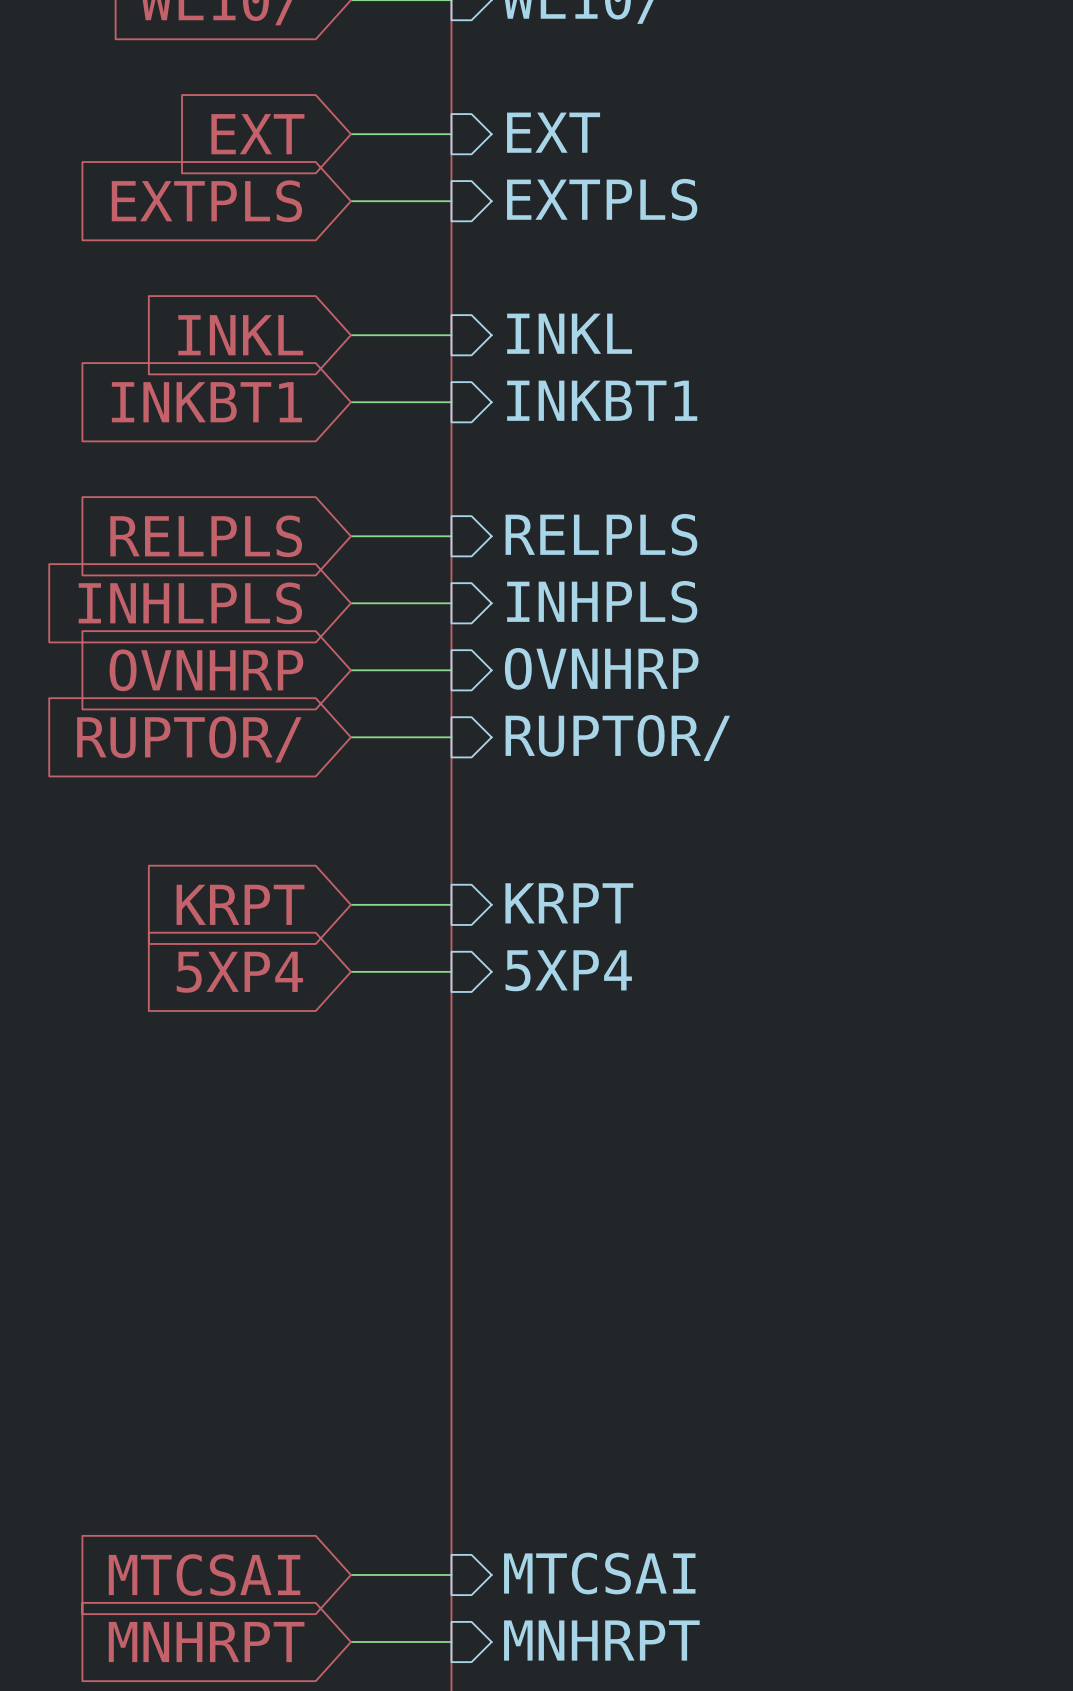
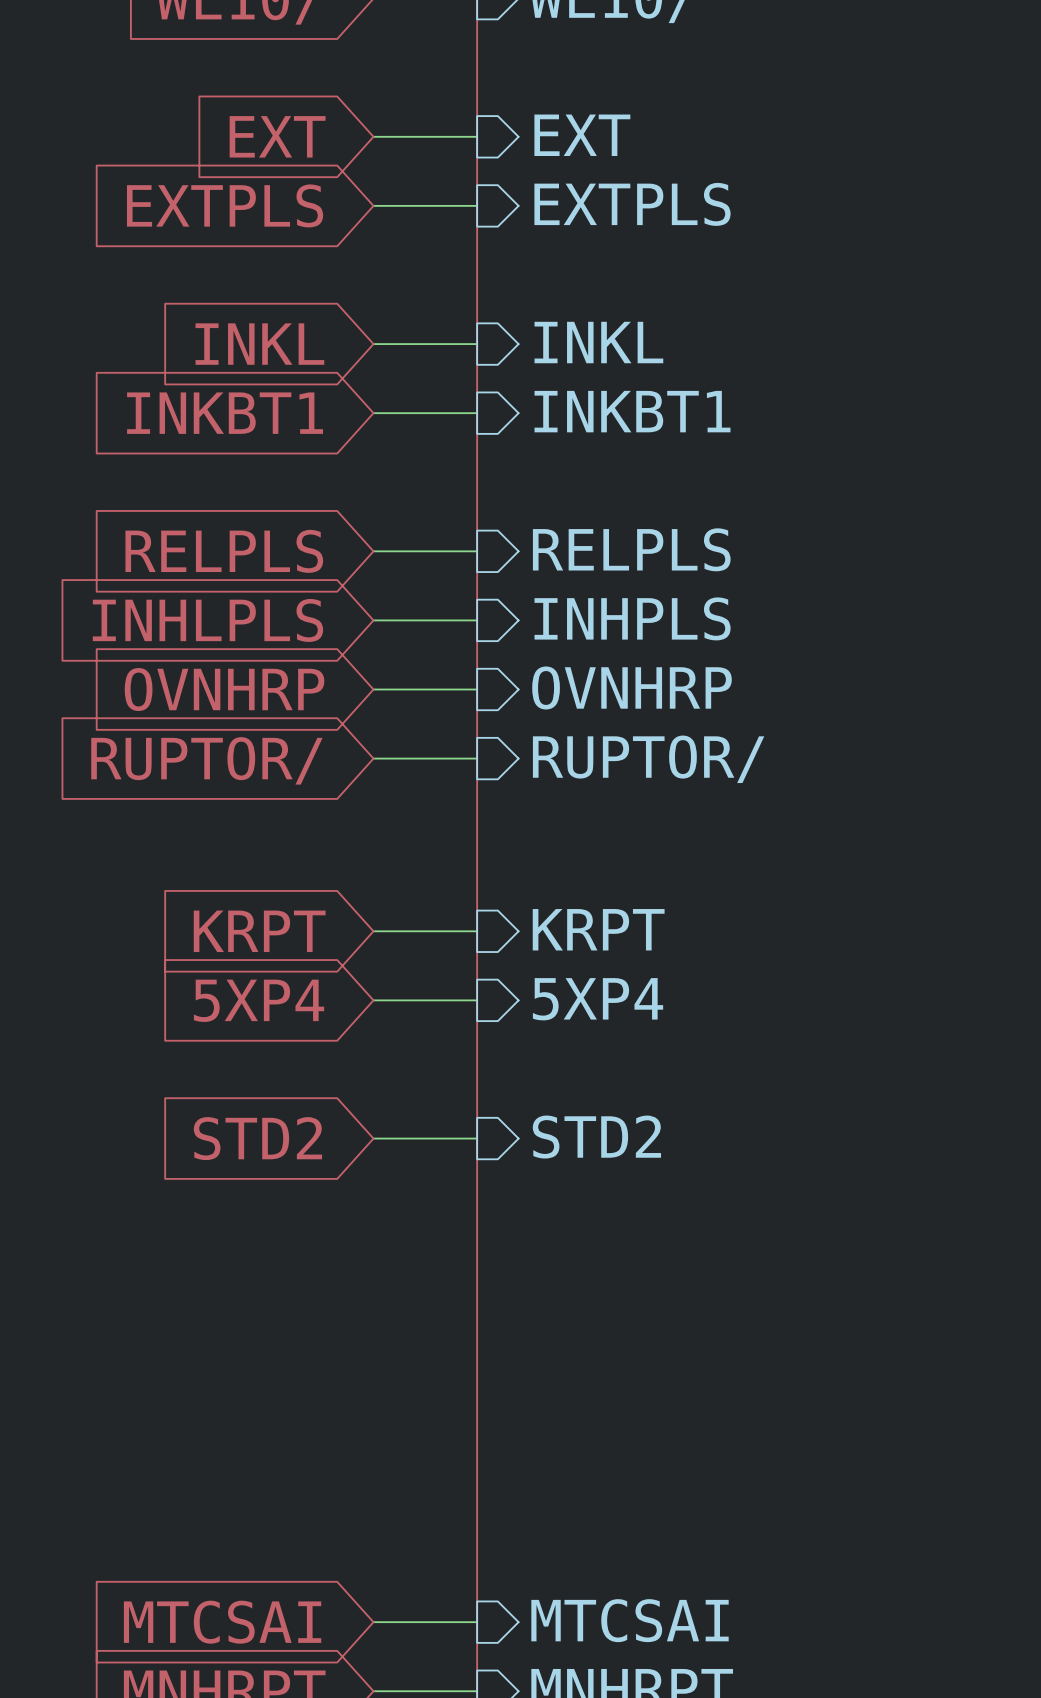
sheet pin: none -> STD2 (596, 1137)
global label: none -> STD2 (257, 1138)
wire: none -> (373, 1138) (477, 1138)

